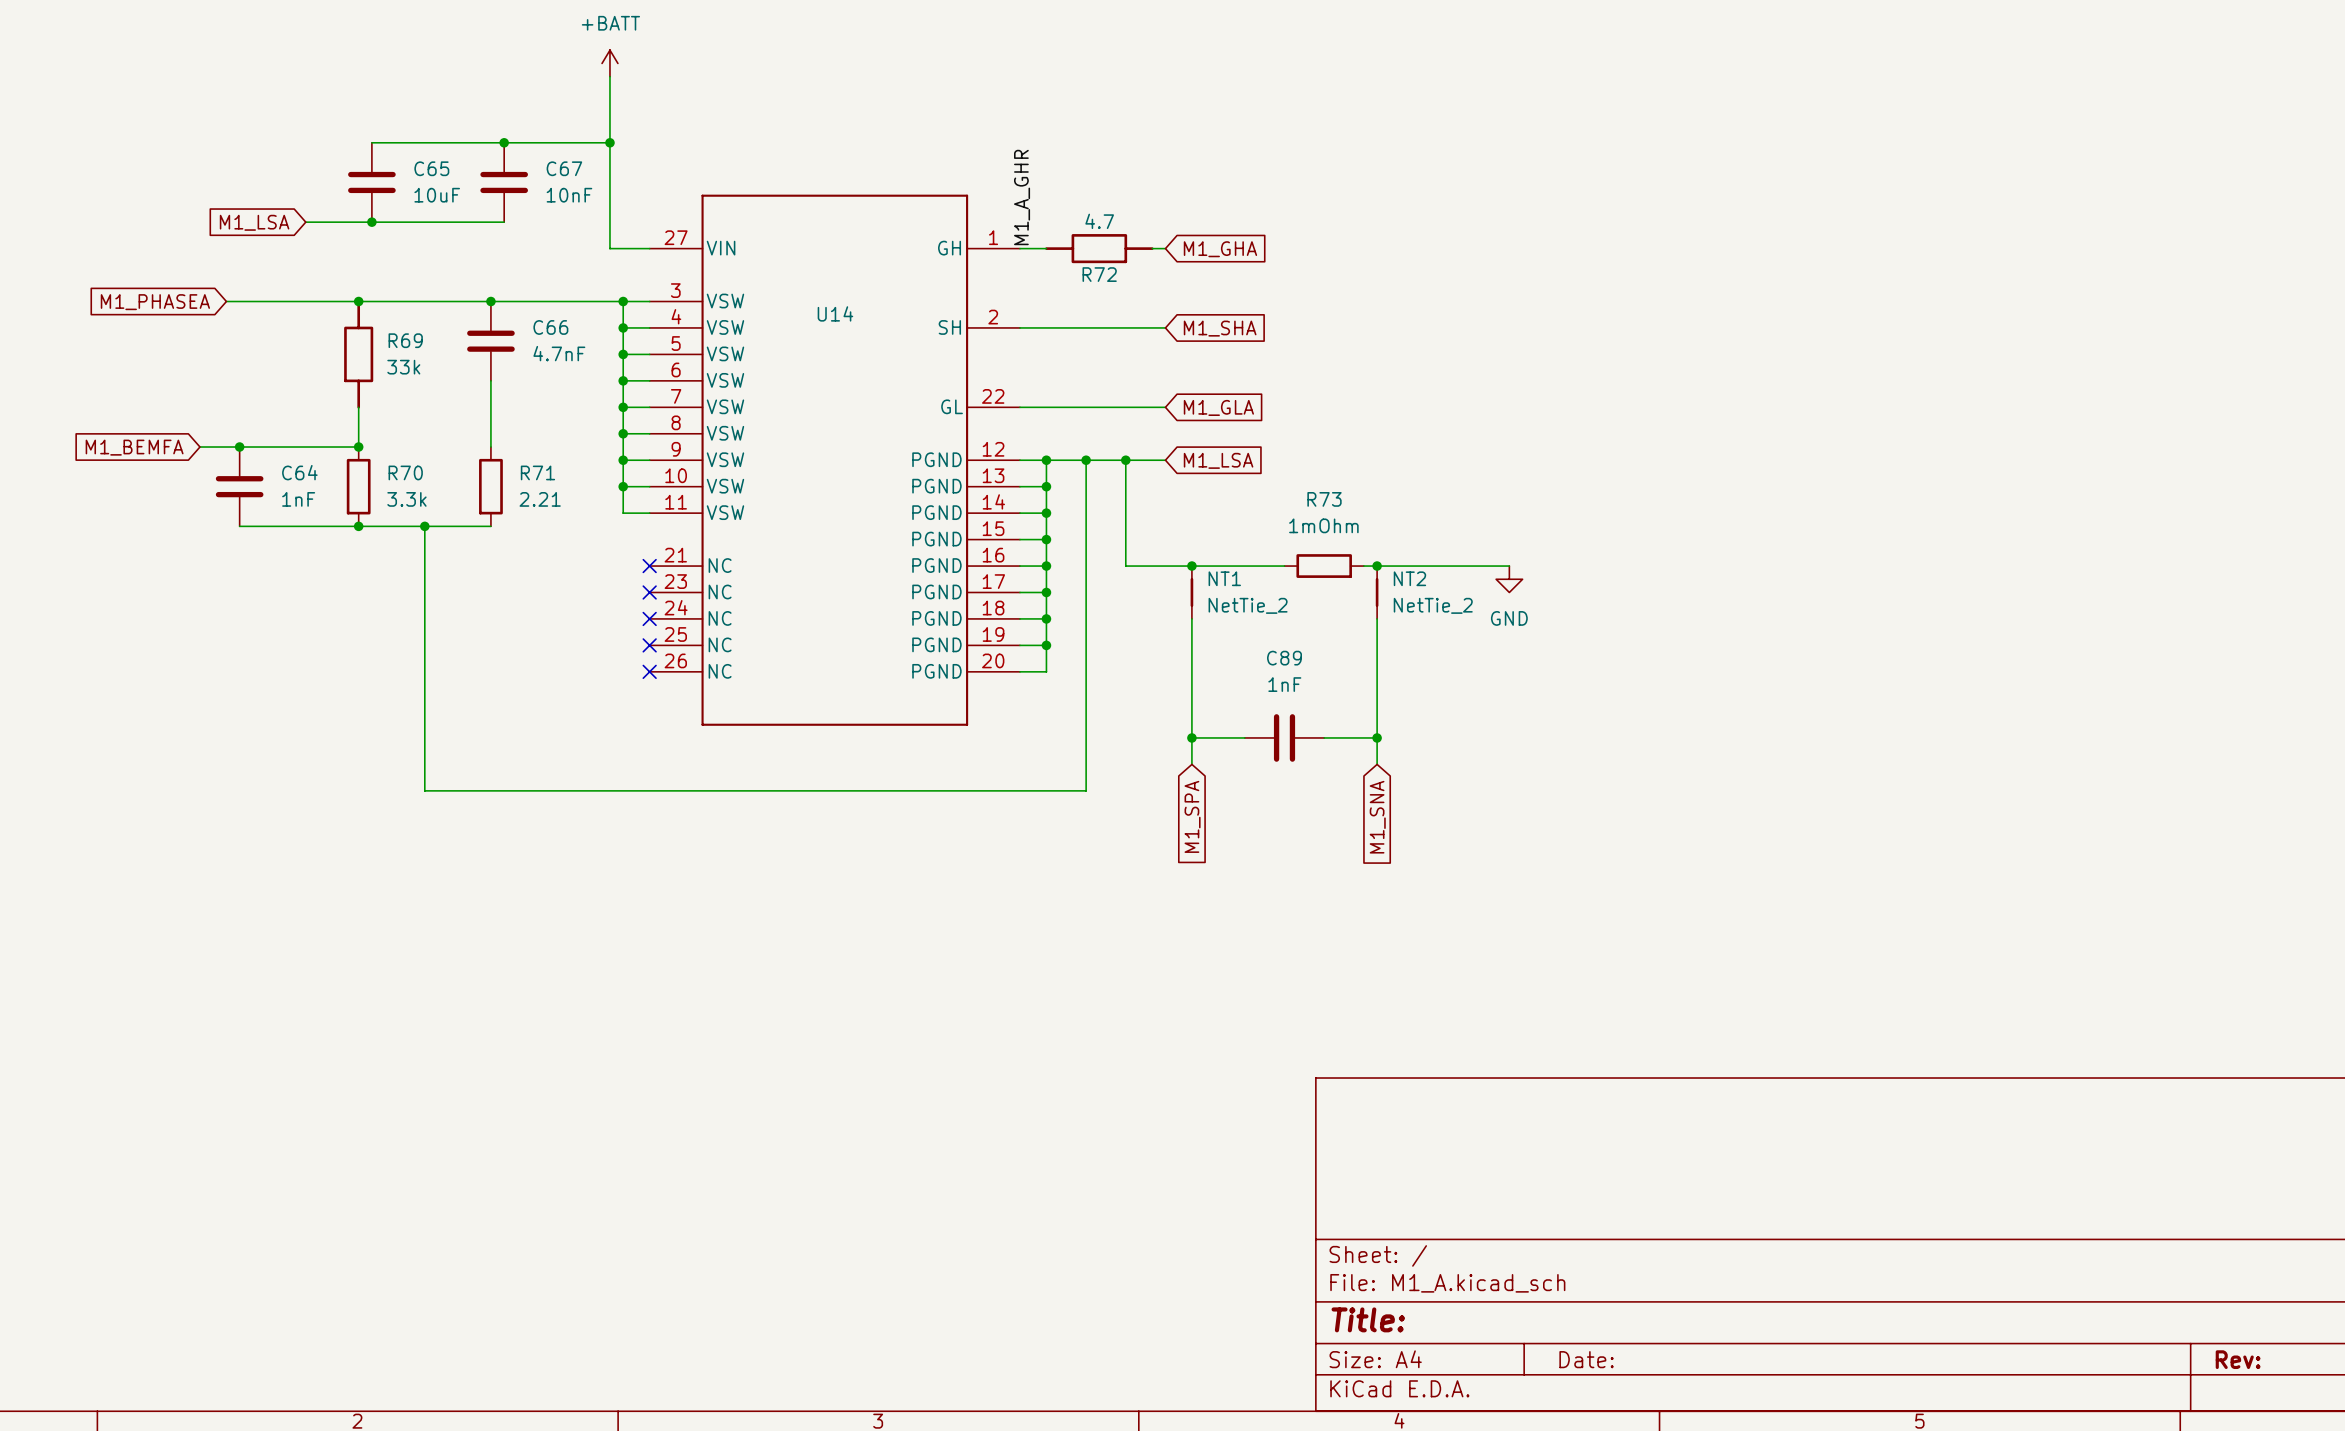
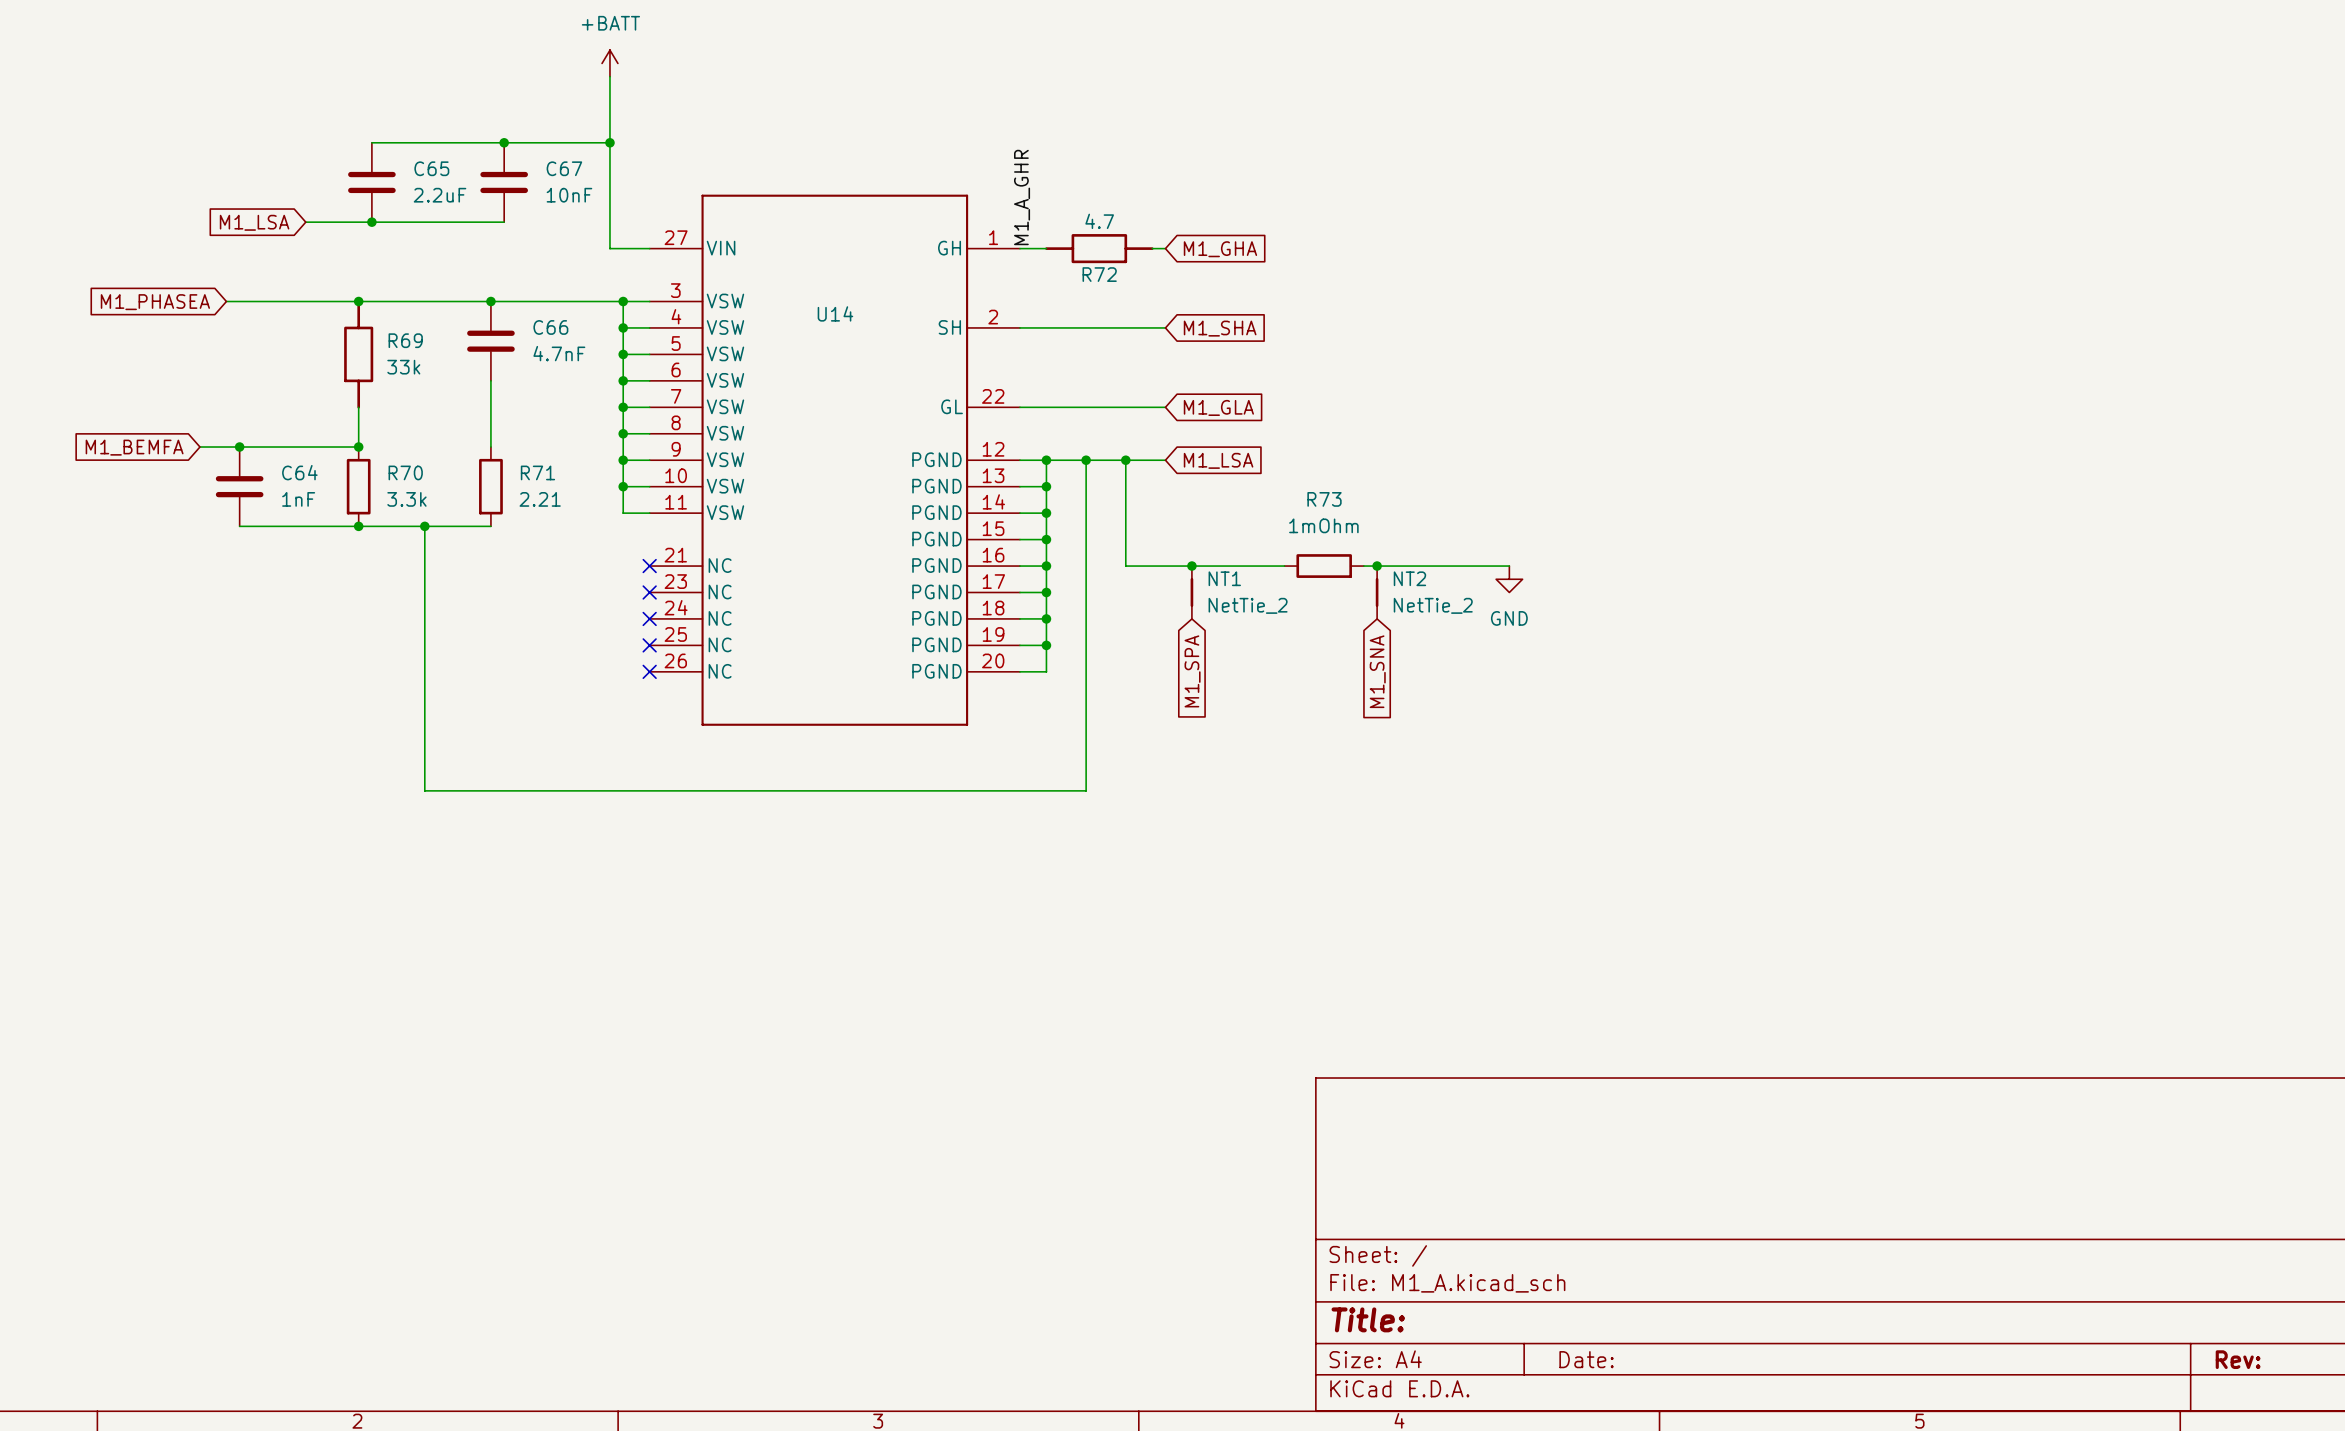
C65 value: 10uF (437, 195) -> 2.2uF (440, 195)
wire: (1191, 618) (1191, 764) -> none
wire: (1377, 618) (1377, 764) -> none
wire: (1191, 737) (1244, 737) -> none
junction: (1191, 737) -> none
C89: 1nF (1284, 737) -> none
wire: (1324, 737) (1377, 737) -> none
junction: (1377, 737) -> none
global label position: M1_SPA (1192, 816) -> M1_SPA (1192, 671)
global label position: M1_SNA (1377, 817) -> M1_SNA (1377, 671)

